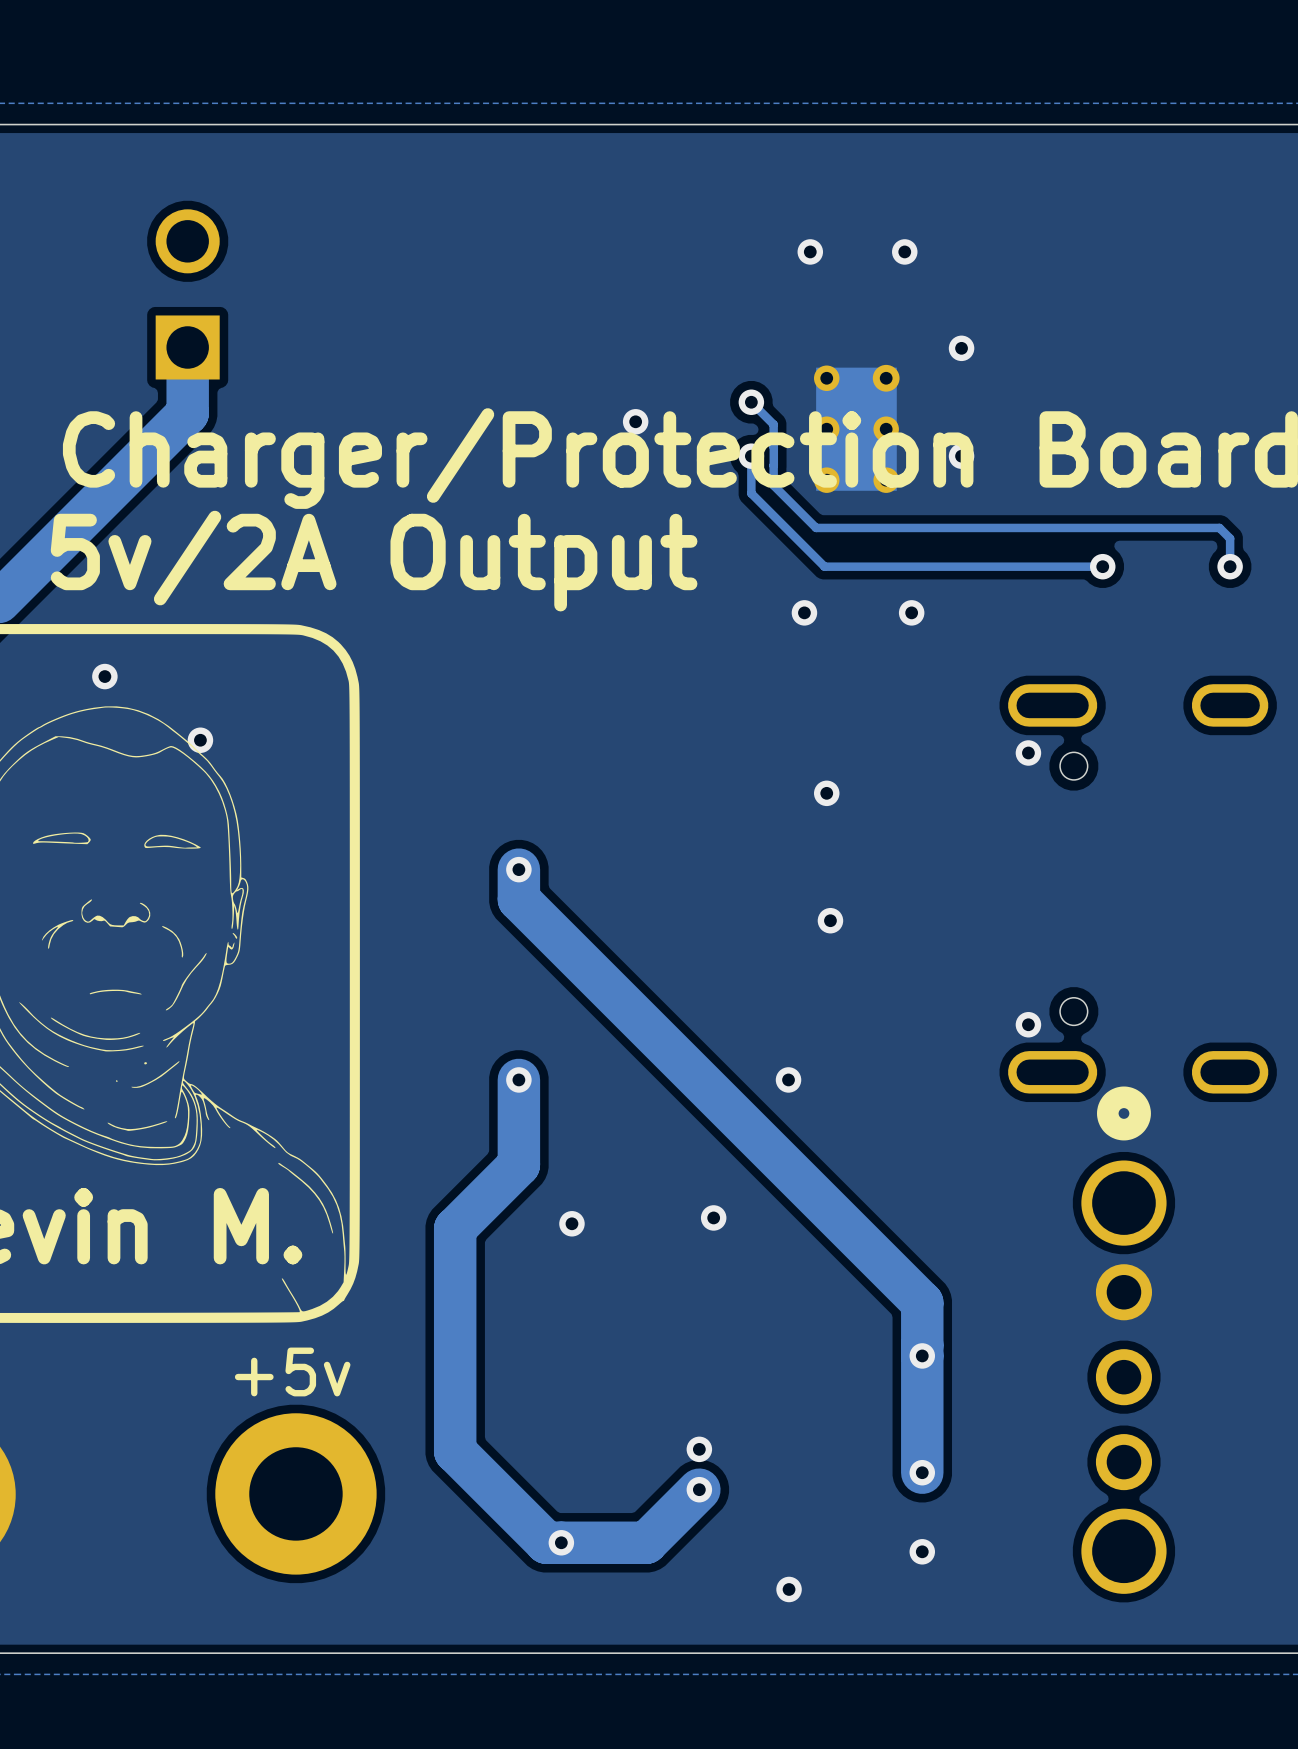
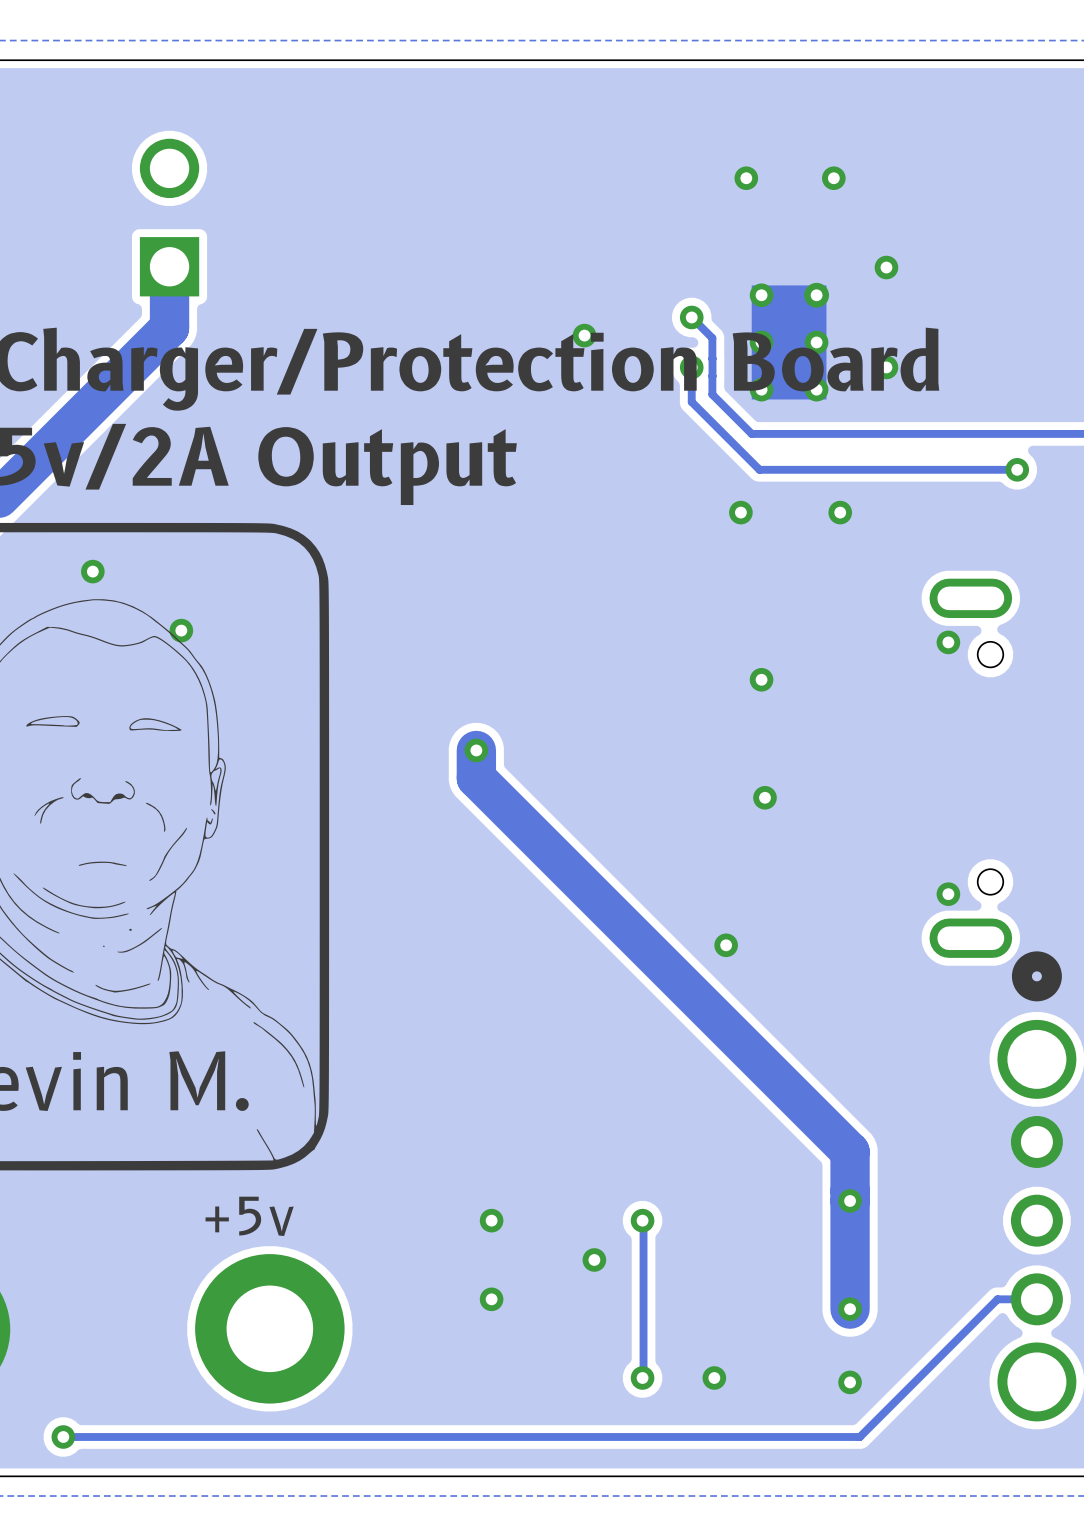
track: (518, 1079) (518, 1164) (455, 1228) (455, 1451) (546, 1542) (646, 1542) (699, 1489) -> none
via: (518, 1079) -> none
via: (713, 1217) -> none
via: (571, 1223) -> none
via: none -> (491, 1220)
track: none -> (642, 1220) (642, 1377)
via: none -> (642, 1220)
via: none -> (594, 1259)
via: (699, 1449) -> none
via: none -> (491, 1299)
track: none -> (1036, 1299) (997, 1299) (859, 1437) (63, 1437)
via: (699, 1489) -> none
via: (561, 1542) -> none
via: none -> (642, 1377)
via position: (789, 1589) -> (714, 1377)
via: none -> (63, 1437)

